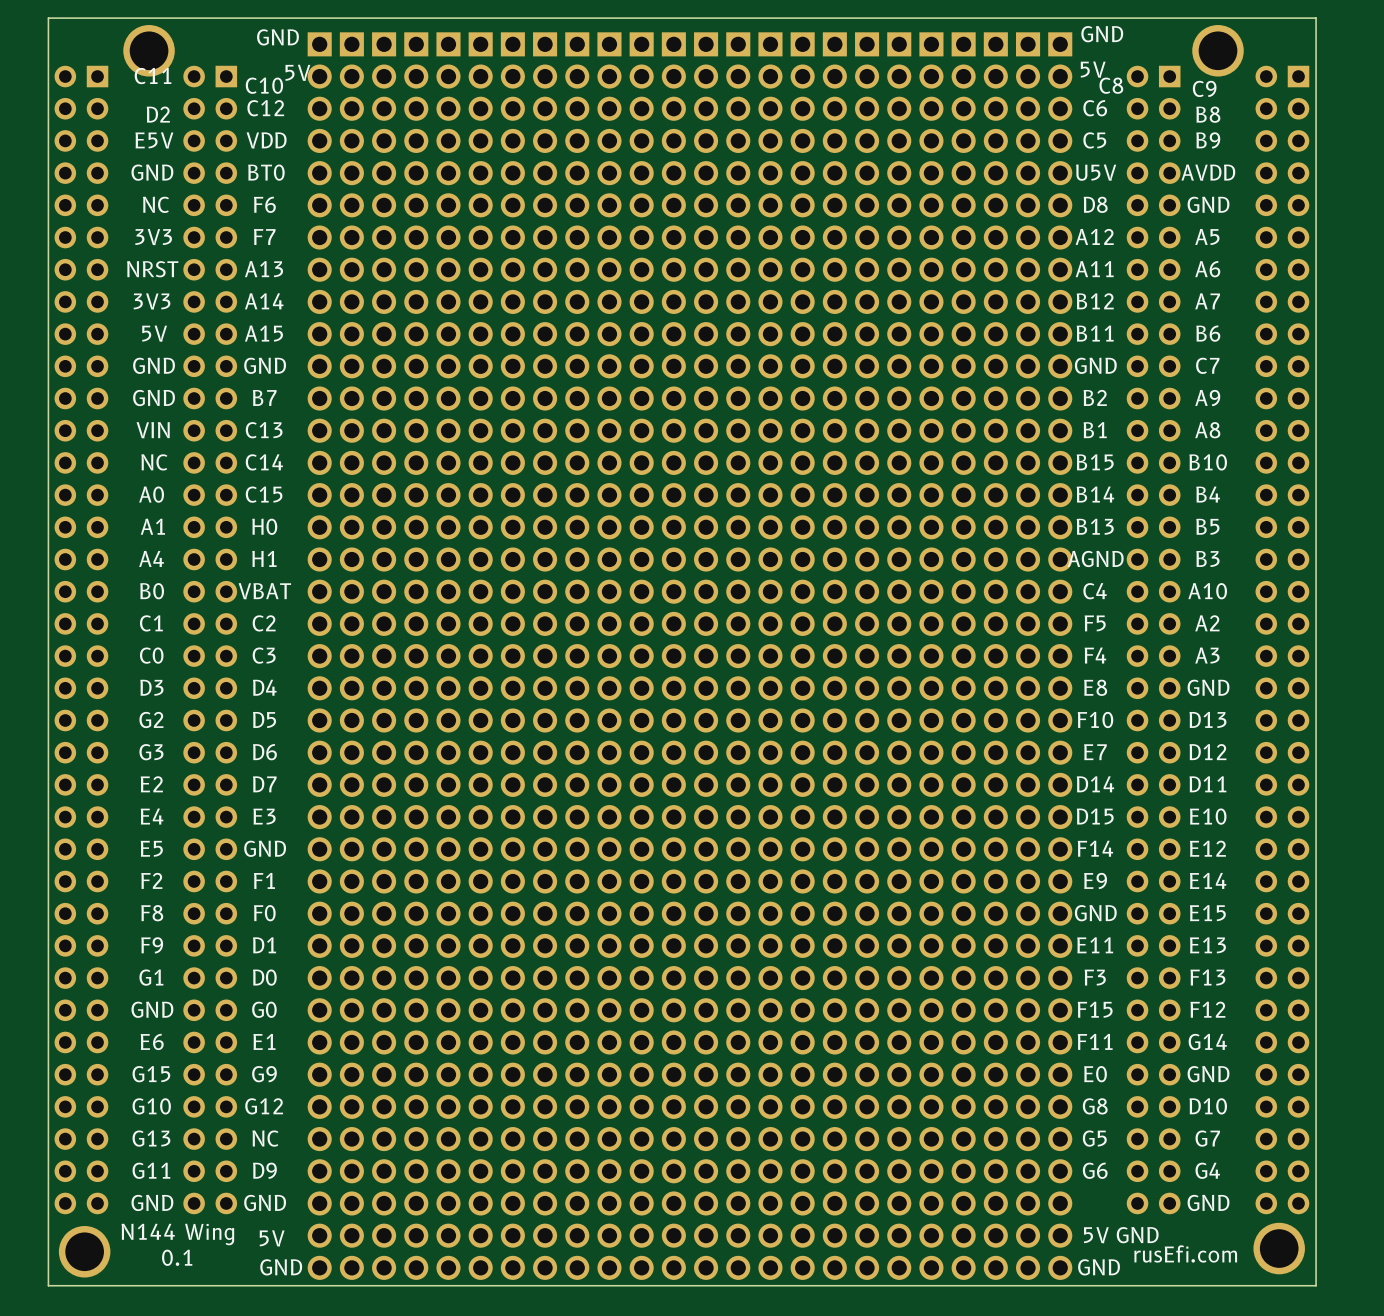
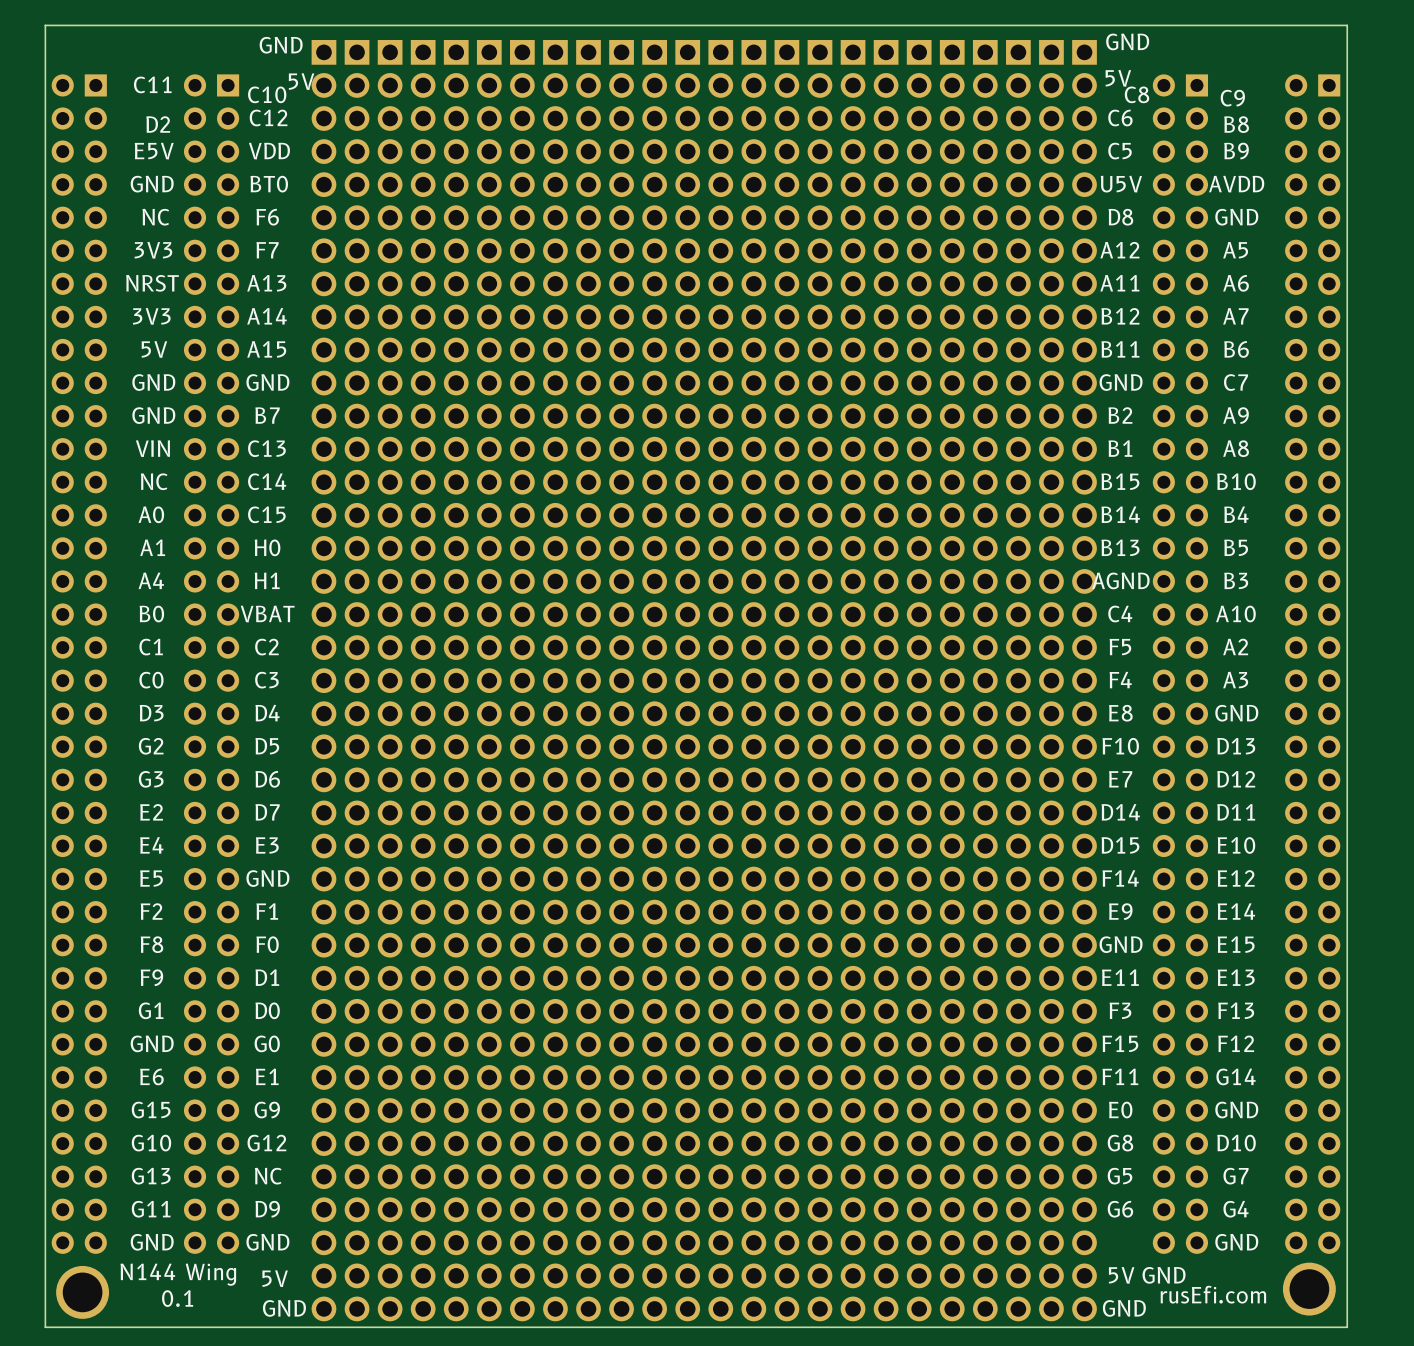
part: (149, 50) -> none
part: (1218, 50) -> none

